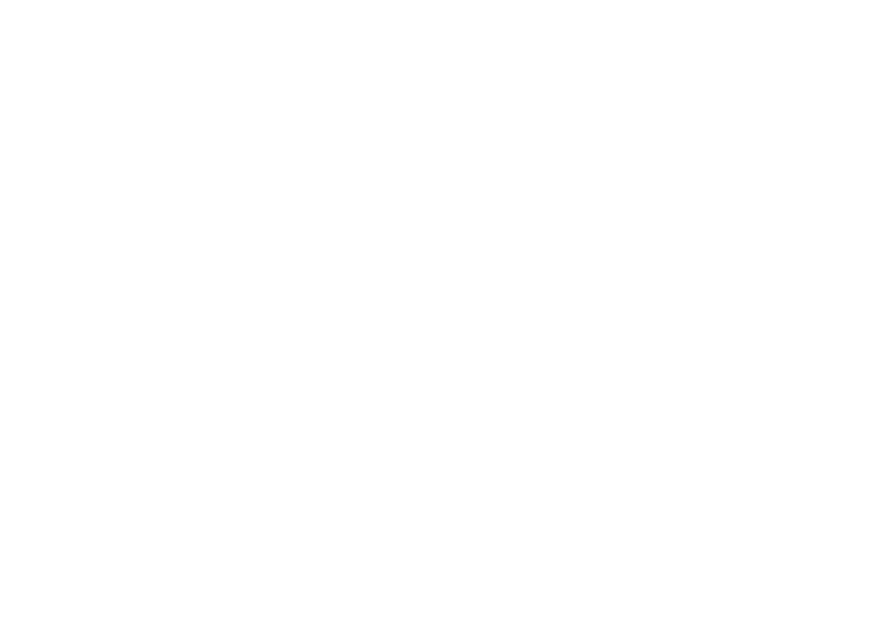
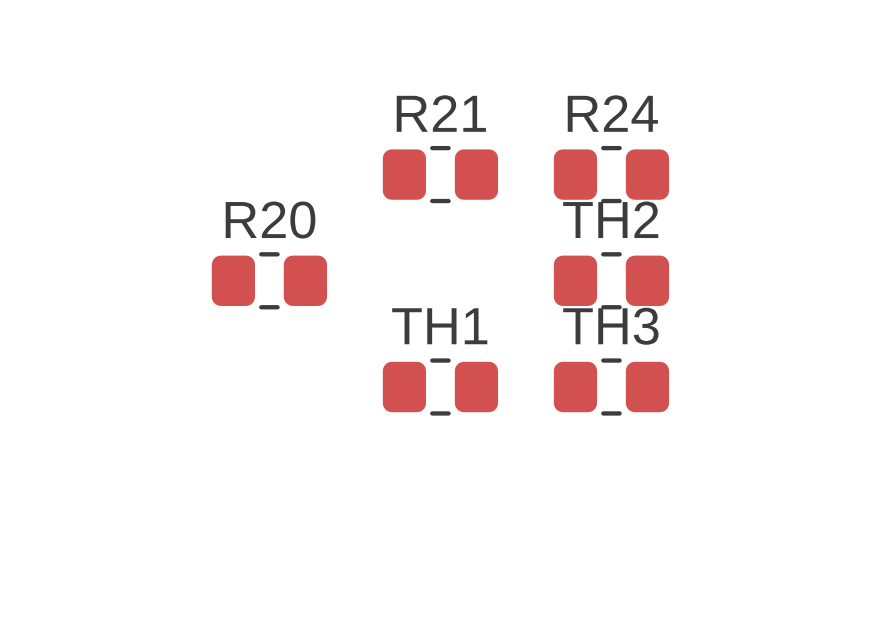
R21: none -> (440, 174)
R24: none -> (611, 174)
R20: none -> (269, 280)
TH2: none -> (611, 280)
TH1: none -> (440, 387)
TH3: none -> (611, 387)

